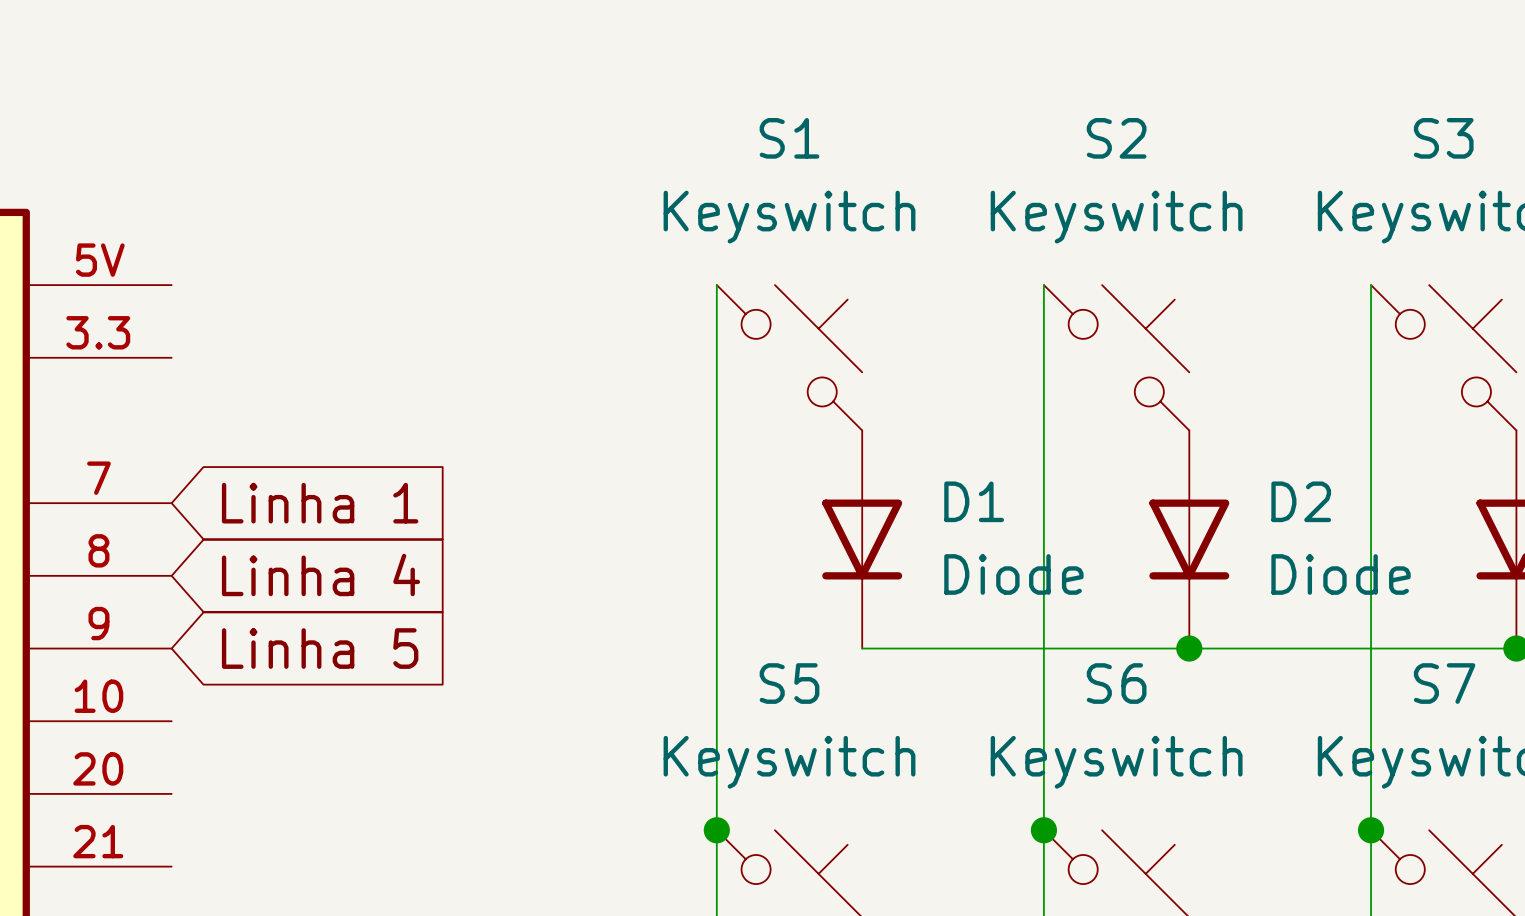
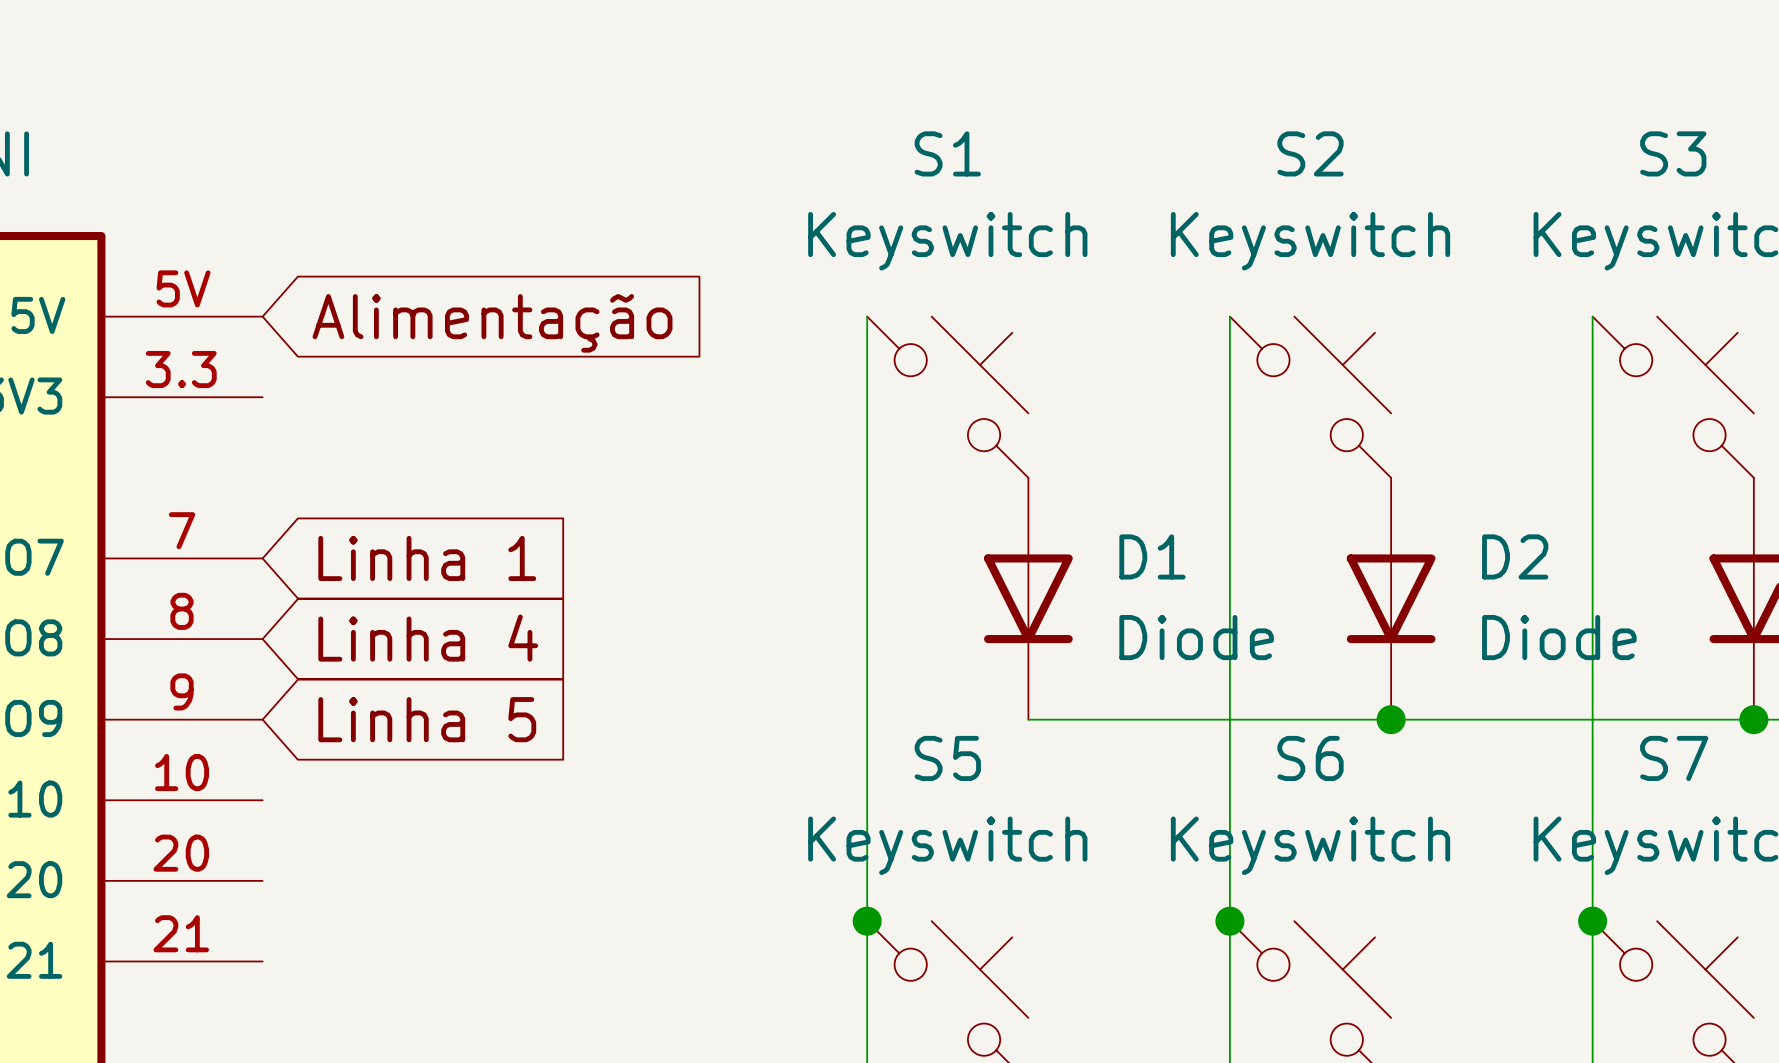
global label: none -> Alimentação (492, 323)

